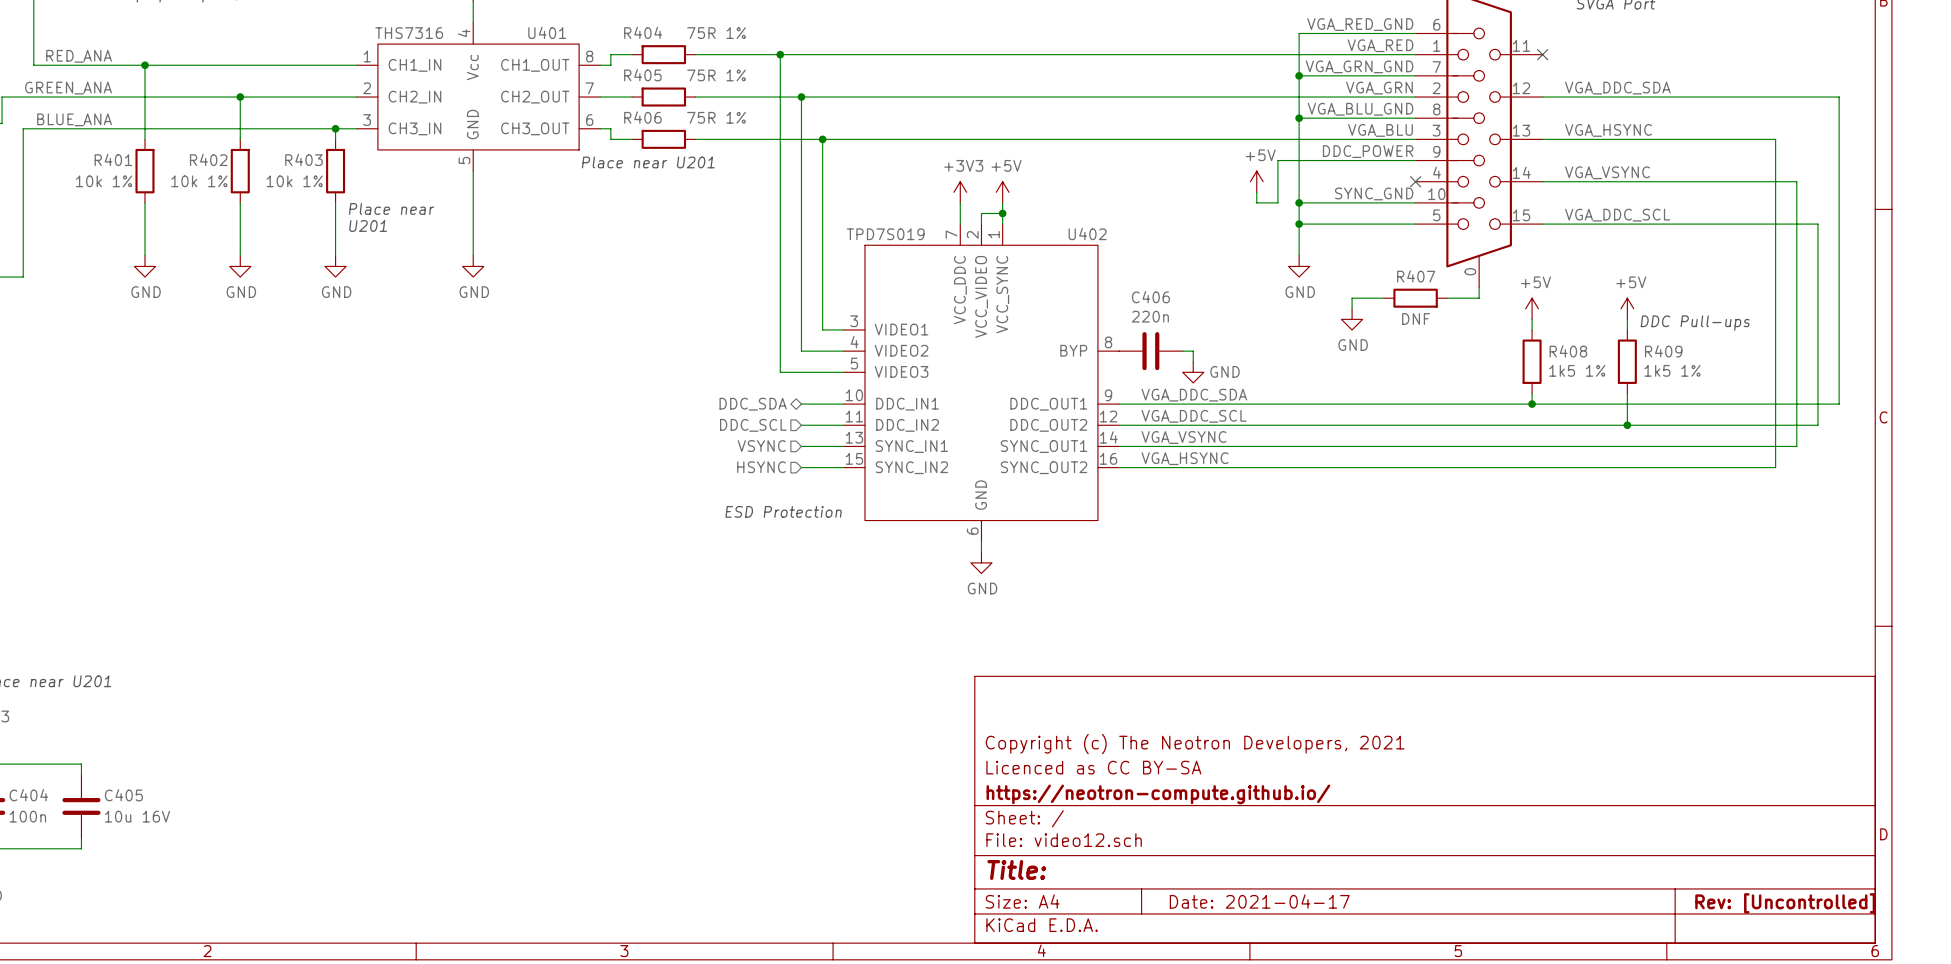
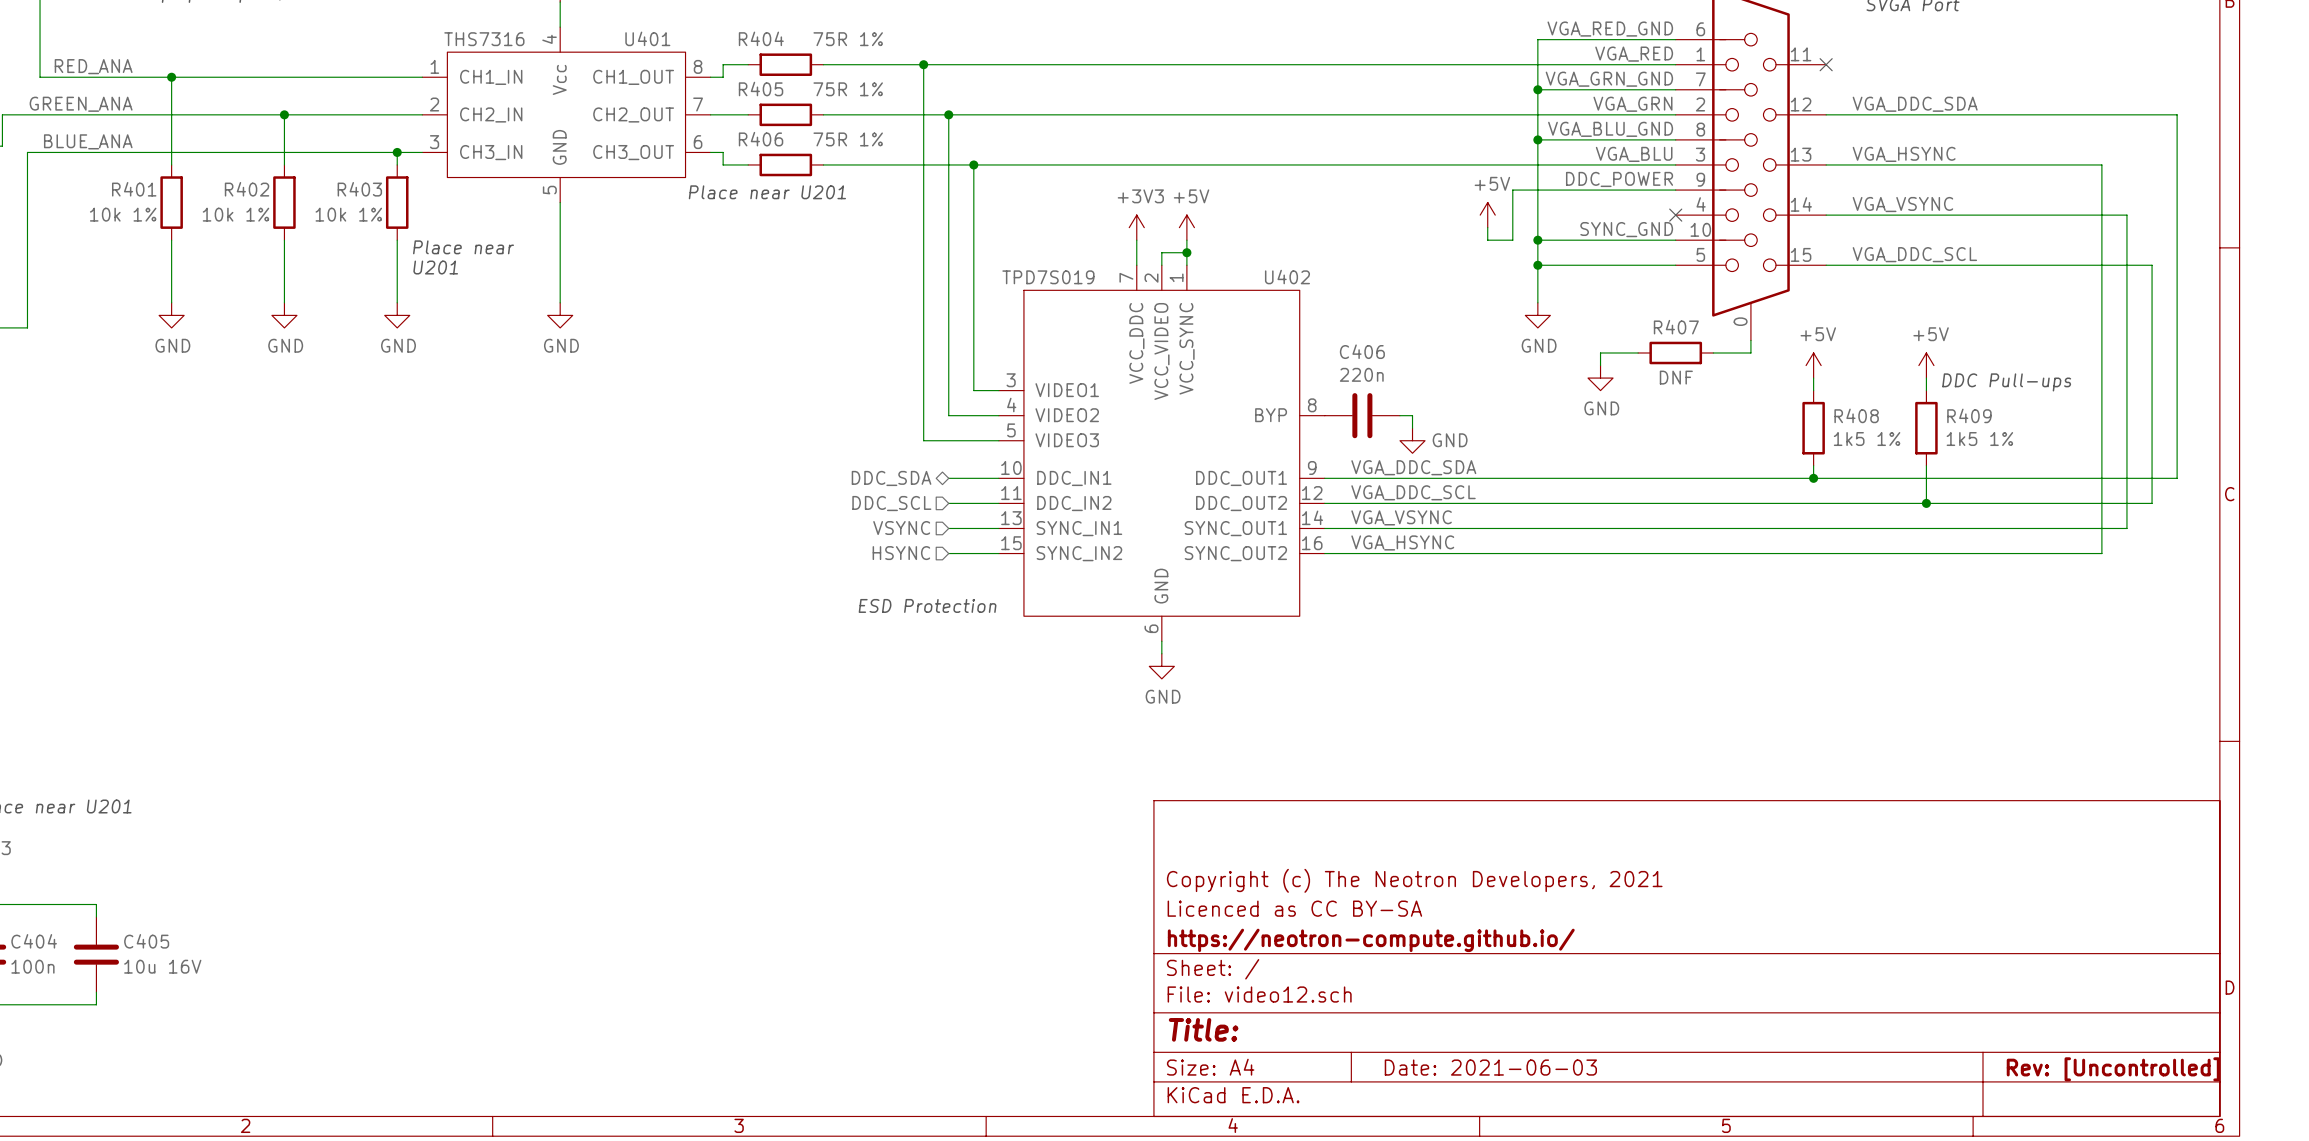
title block: Date: 2021-04-17 (1259, 901) -> Date: 2021-06-03 (1490, 1067)

